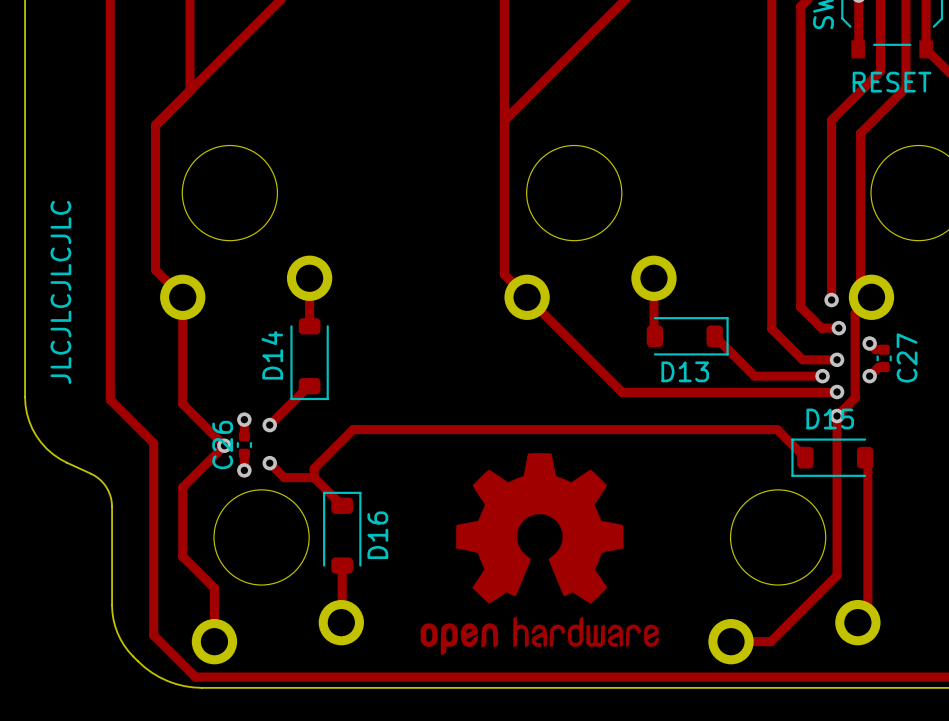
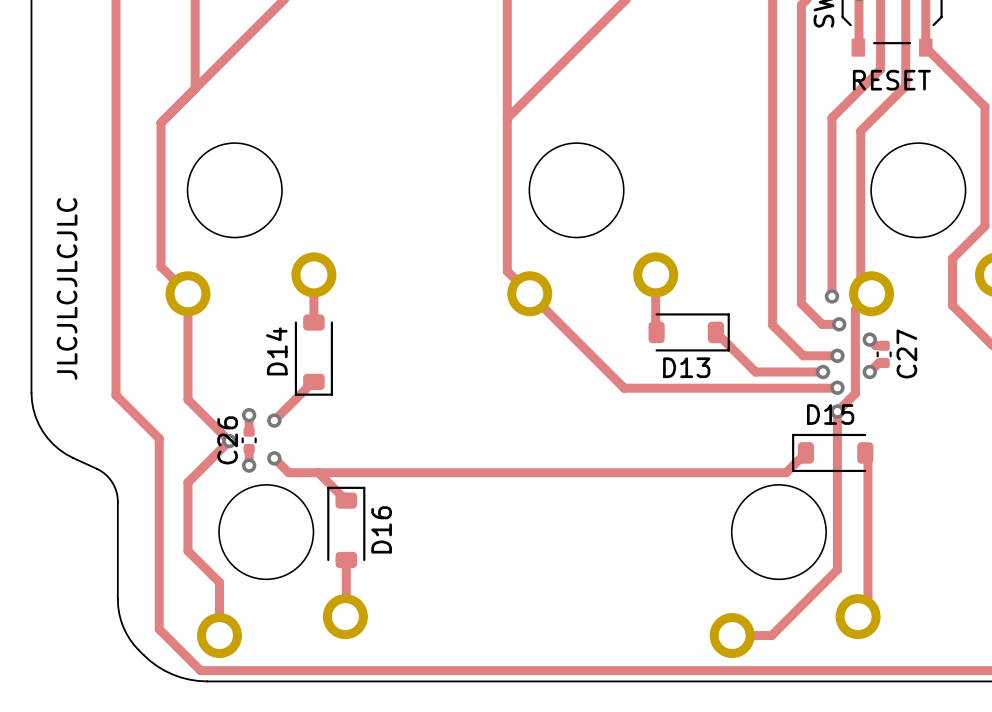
drawing: [420, 453, 659, 655] -> none
track: (805, 457) (777, 429) (353, 429) (314, 468) (314, 477) -> (805, 452) (786, 472) (318, 472)

